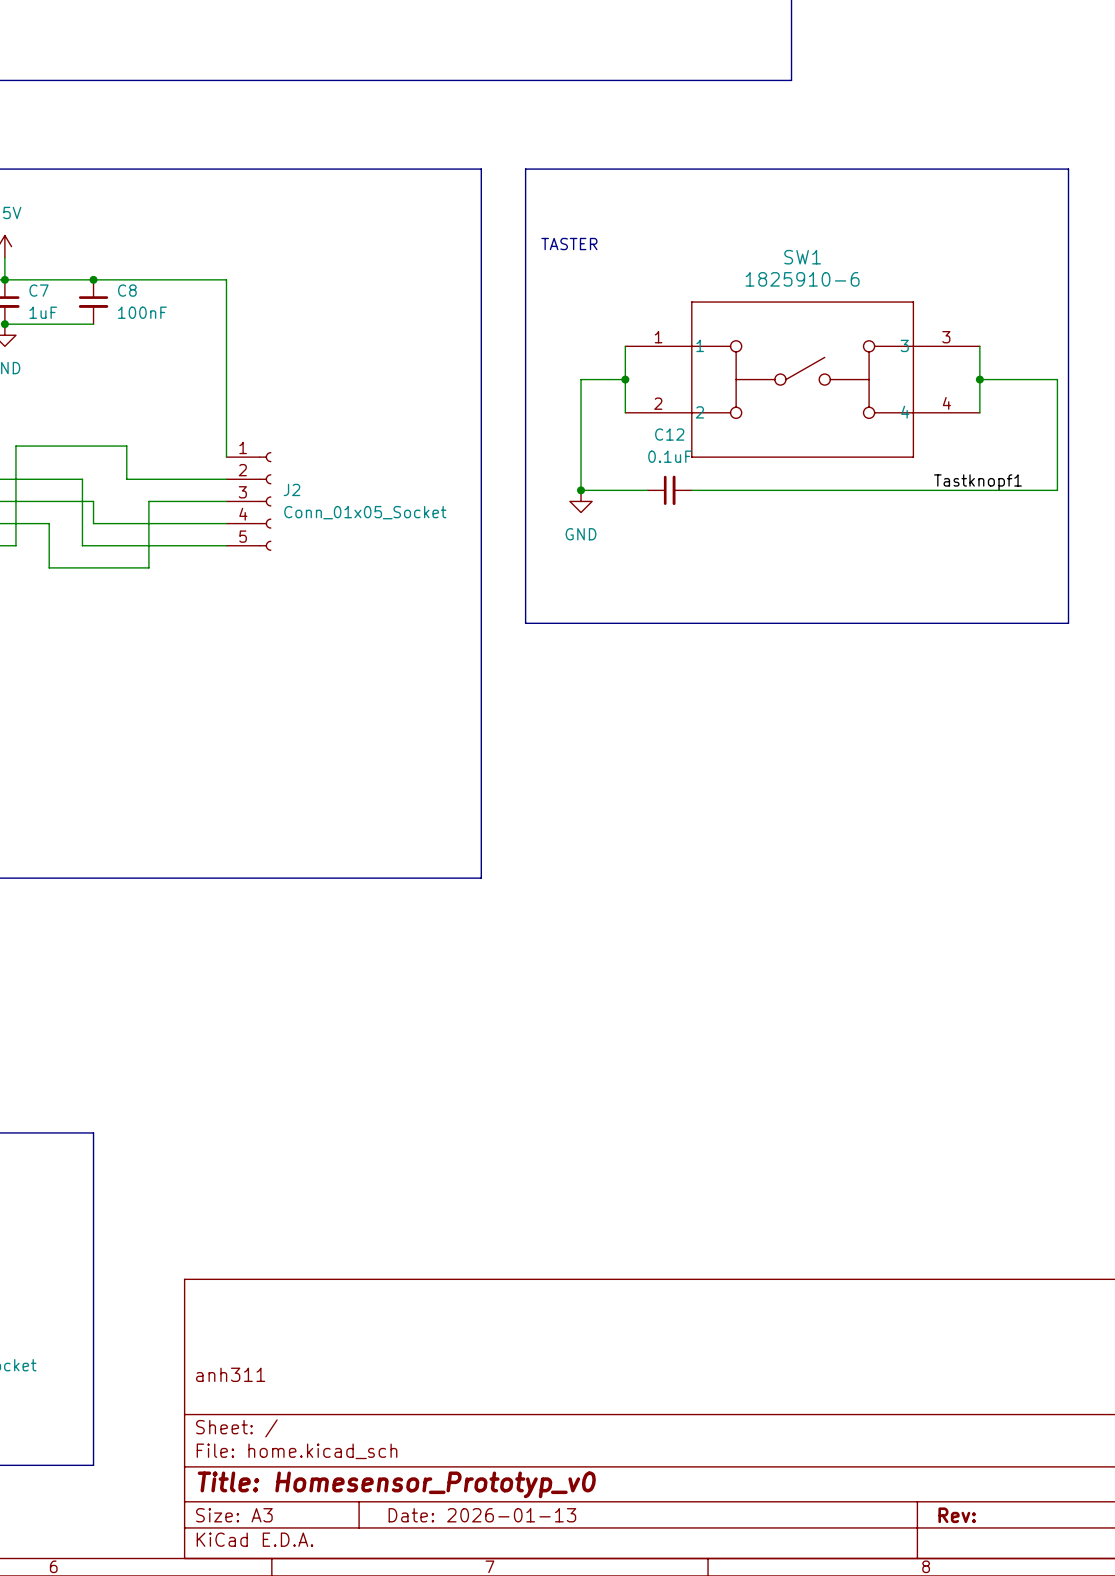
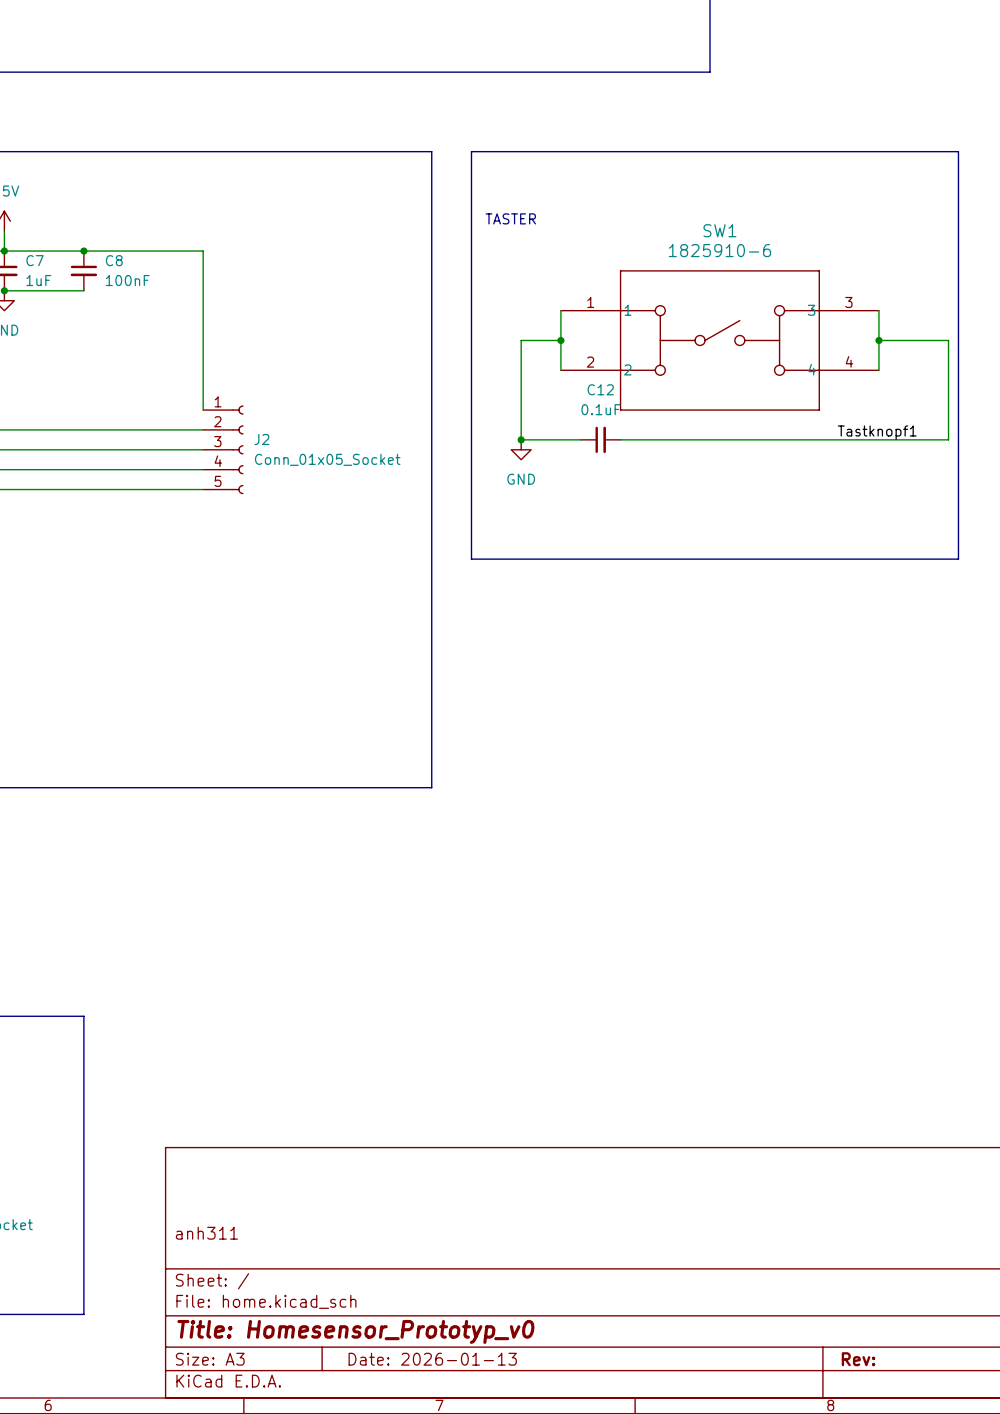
wire: (82, 479) (82, 545) -> (73, 429) (113, 429)
wire: (126, 479) (126, 446) (15, 446) (15, 545) -> (73, 489) (14, 489)
wire: (93, 501) (93, 523) -> (44, 469) (83, 469)
wire: (148, 501) (148, 567) (49, 567) (49, 523) -> (133, 449) (83, 449)

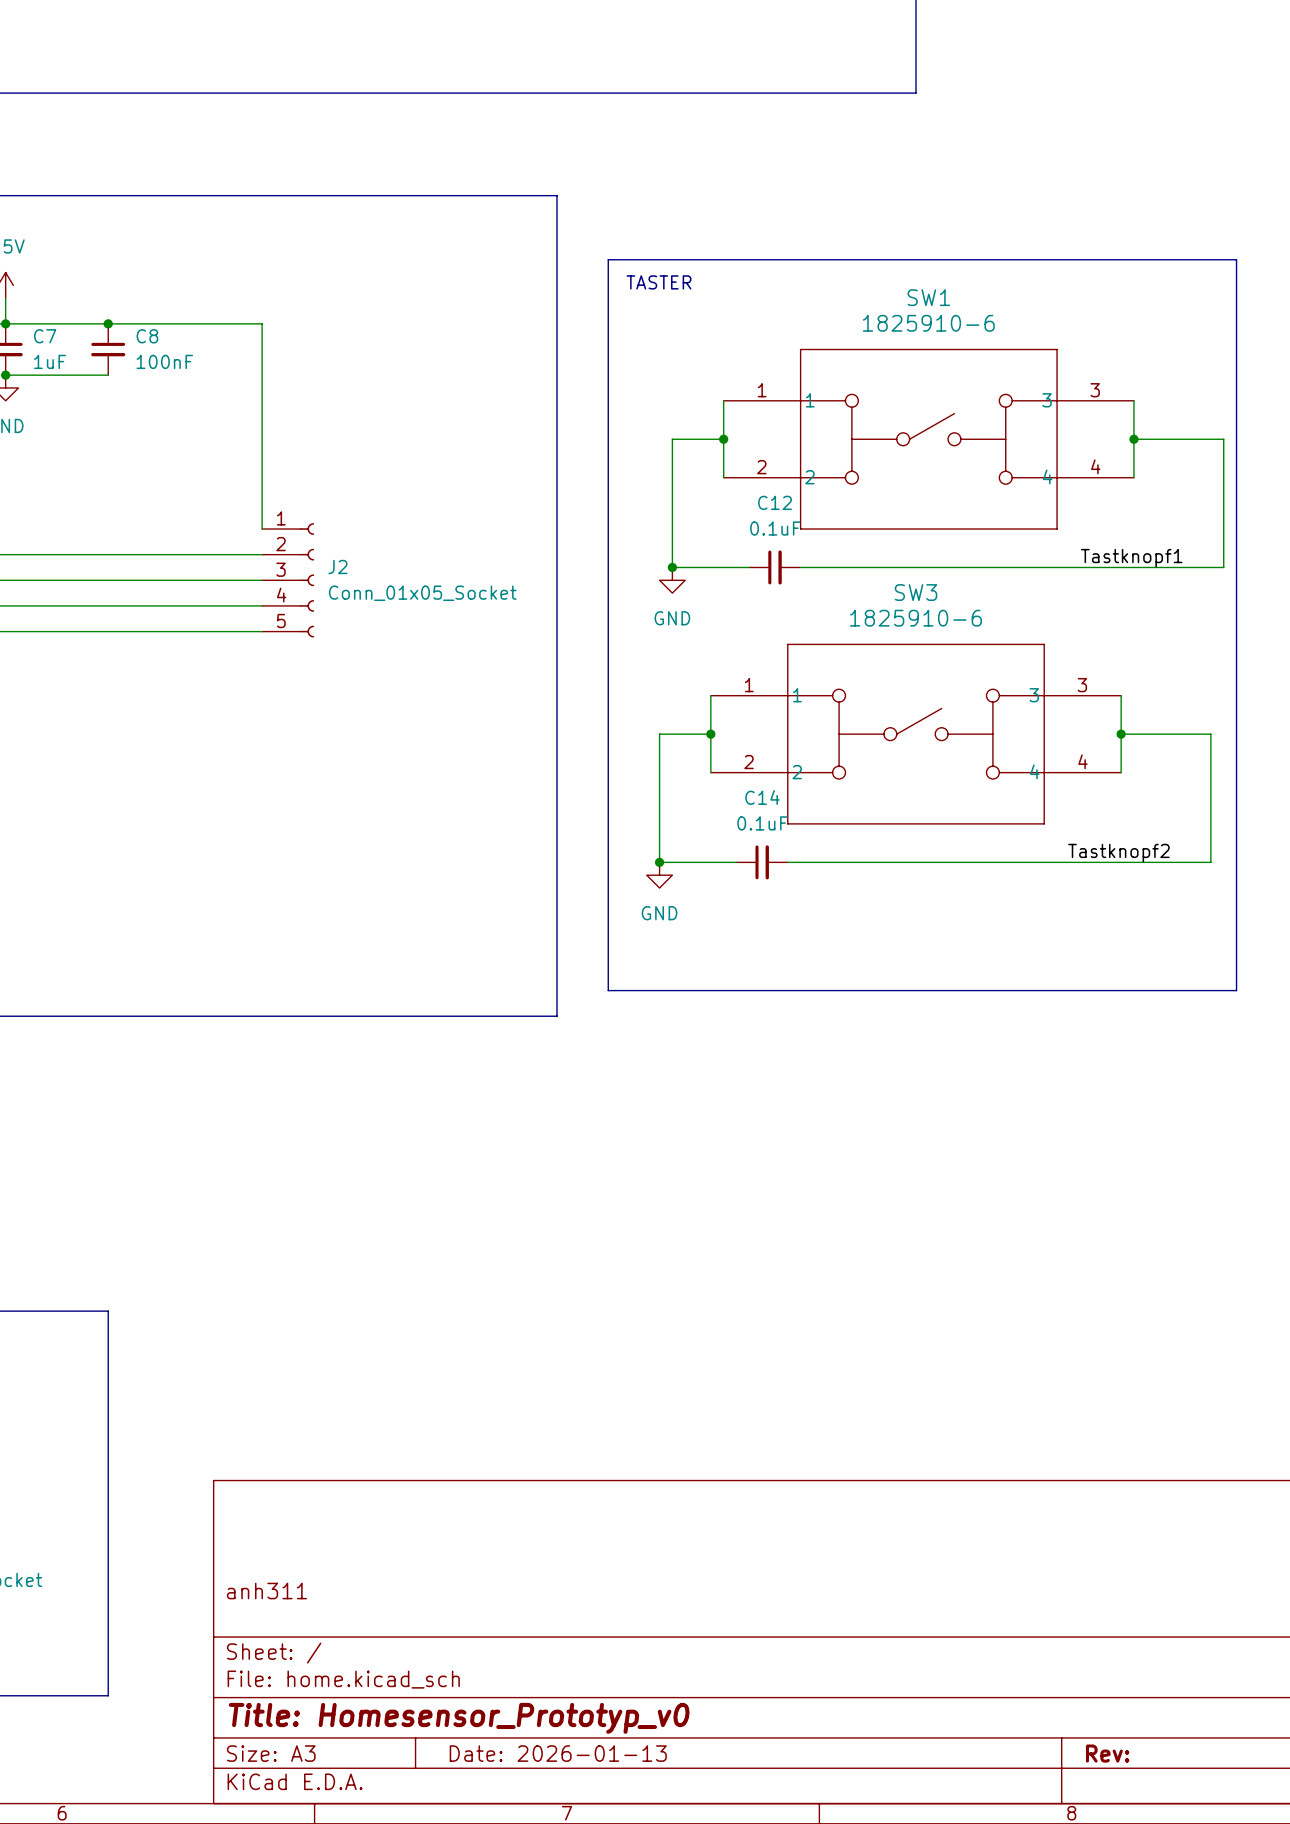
line: (471, 201) (471, 151) (958, 151) (958, 201) -> (608, 259) (1236, 259)
wire: none -> (710, 695) (710, 772)
wire: none -> (1121, 695) (1121, 772)
line: (471, 559) (958, 559) -> (608, 721) (608, 990) (1236, 990) (1236, 721)
wire: none -> (710, 734) (659, 734) (659, 862) (736, 862)
junction: none -> (710, 734)
SW3: none -> 1825910-6 (915, 734)
wire: none -> (1121, 734) (1210, 734) (1210, 862) (787, 862)
junction: none -> (1121, 734)
label: none -> Tastknopf2 (1118, 853)
junction: none -> (659, 862)
C14: none -> 0.1uF (762, 862)
power symbol: none -> GND (659, 875)

